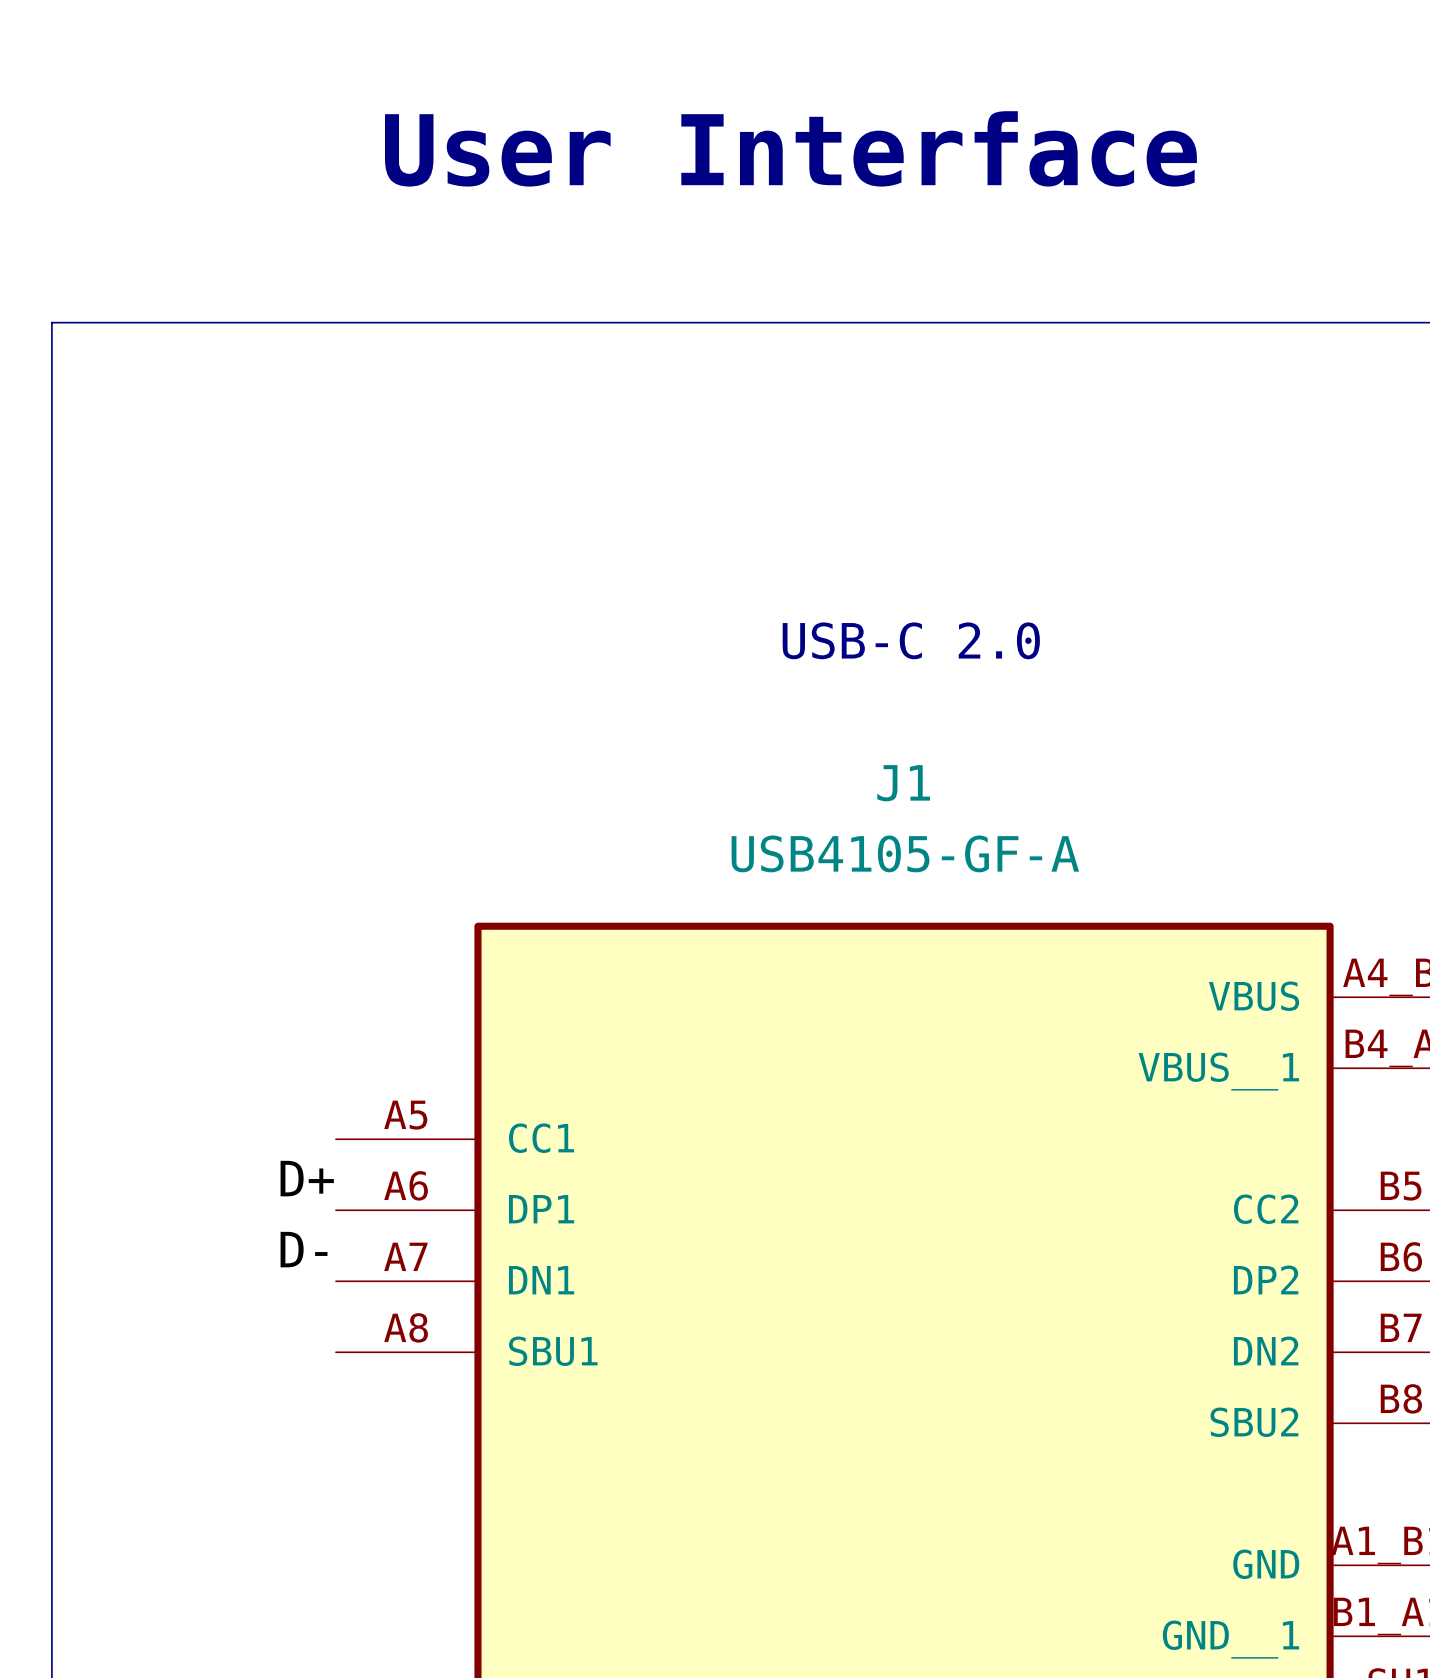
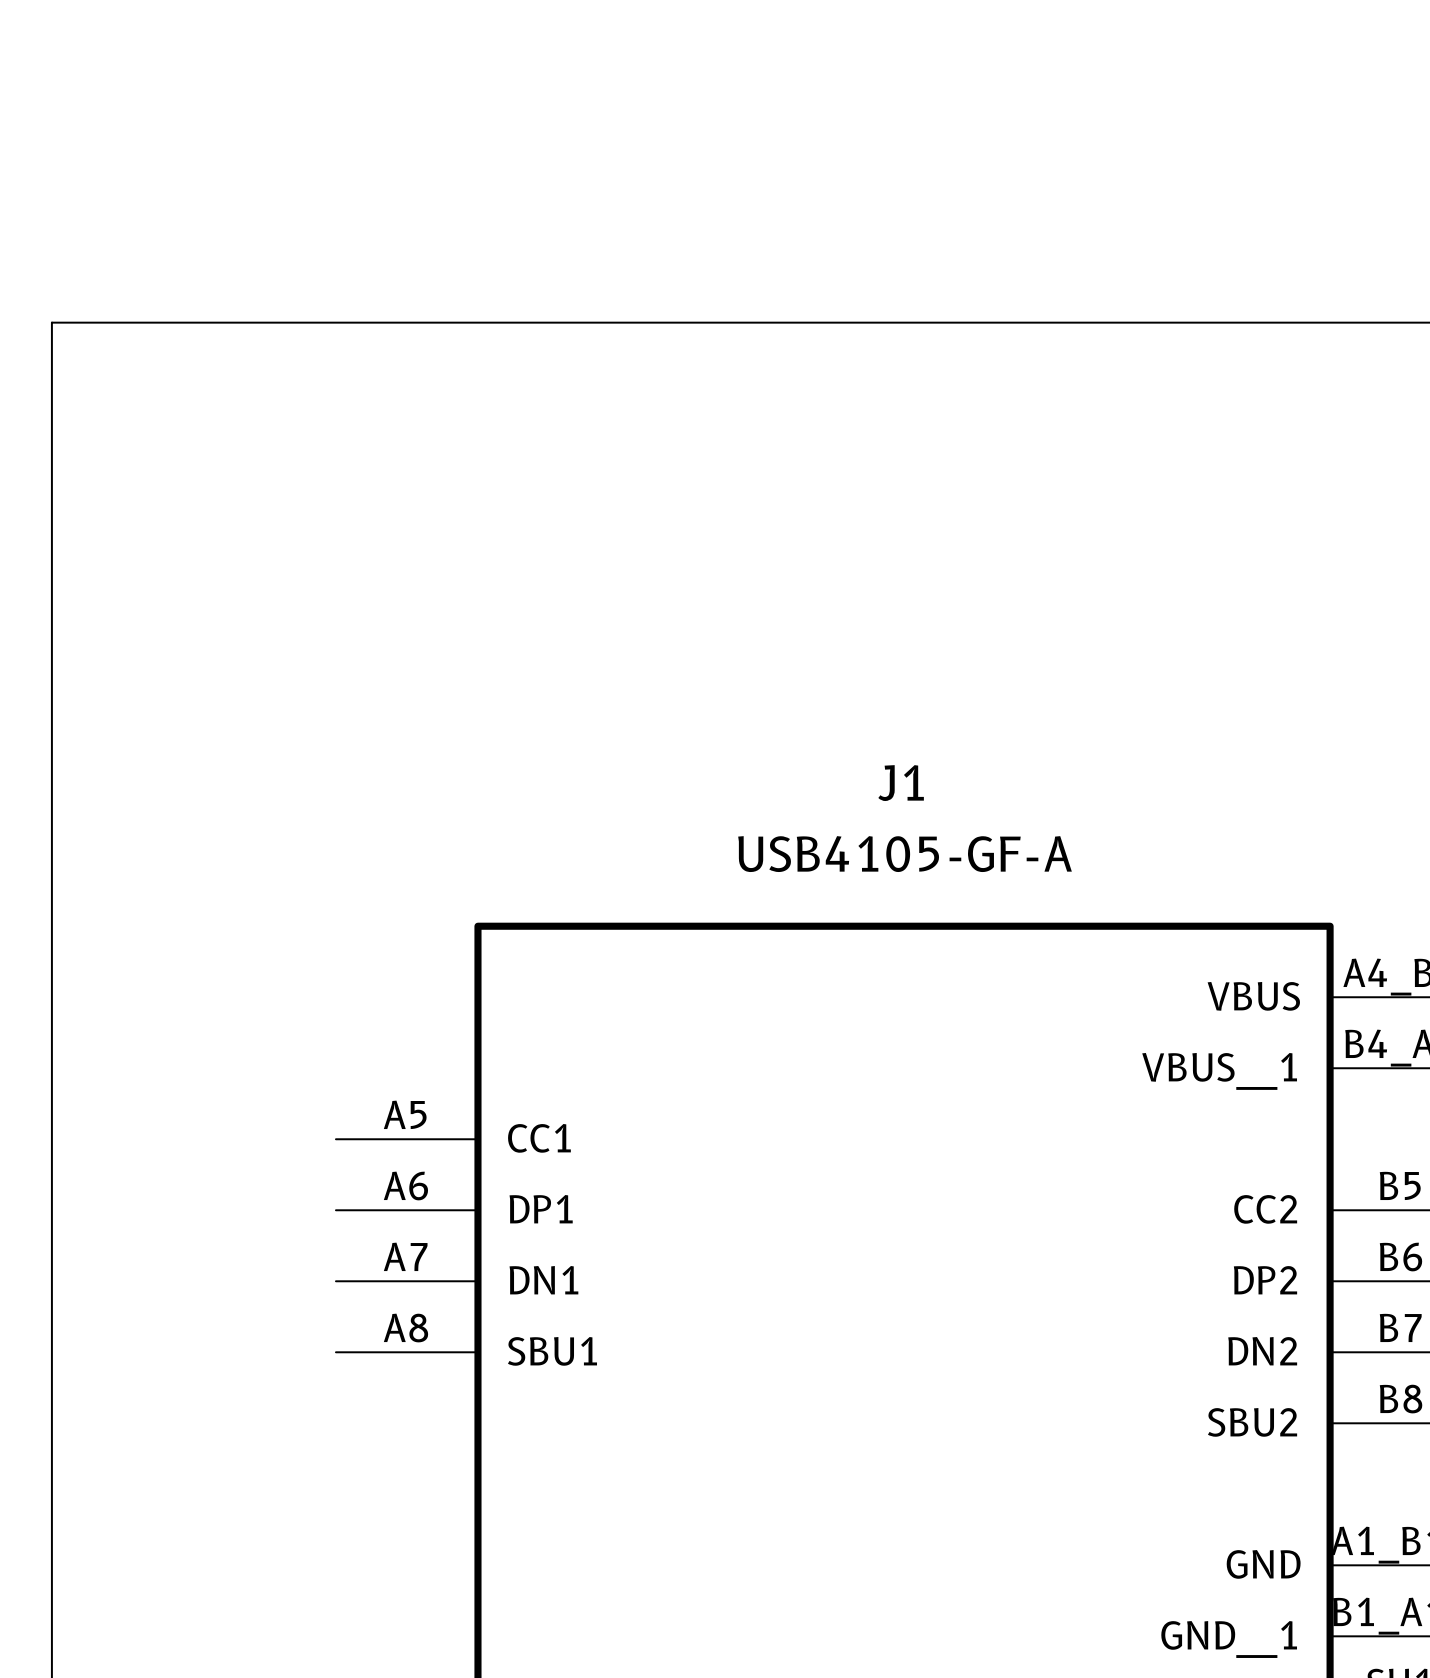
text: User Interface (790, 148) -> none
text: USB-C 2.0 (911, 640) -> none
label: D+ (307, 1178) -> none
label: D- (304, 1249) -> none

